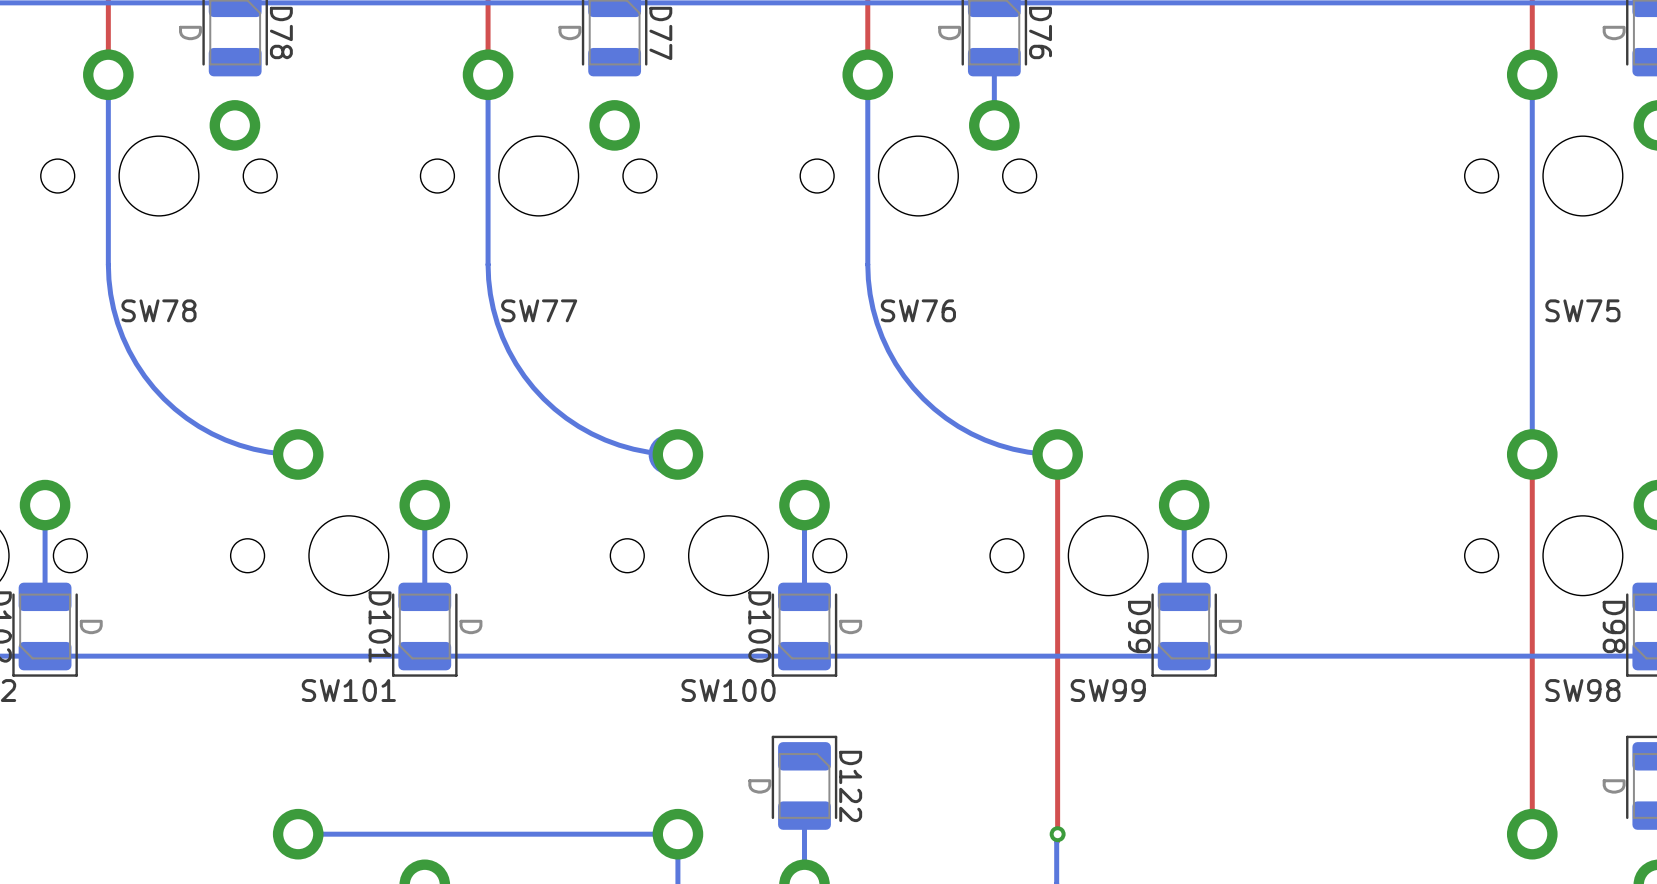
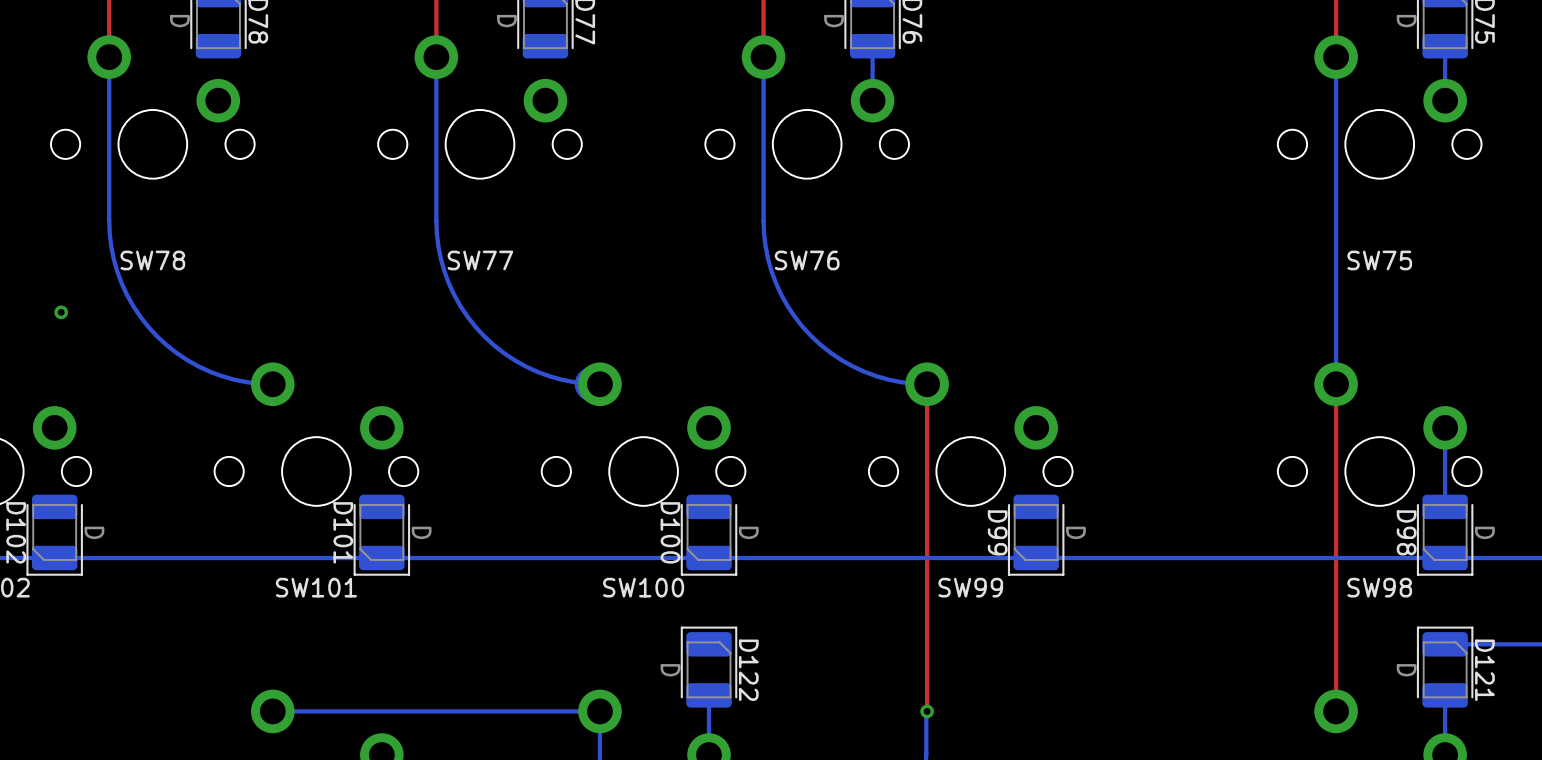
via: none -> (61, 312)
bottom track: (45, 505) (45, 596) -> none
bottom track: (424, 505) (424, 596) -> none
bottom track: (804, 505) (804, 596) -> none
bottom track: (1184, 505) (1184, 596) -> none

